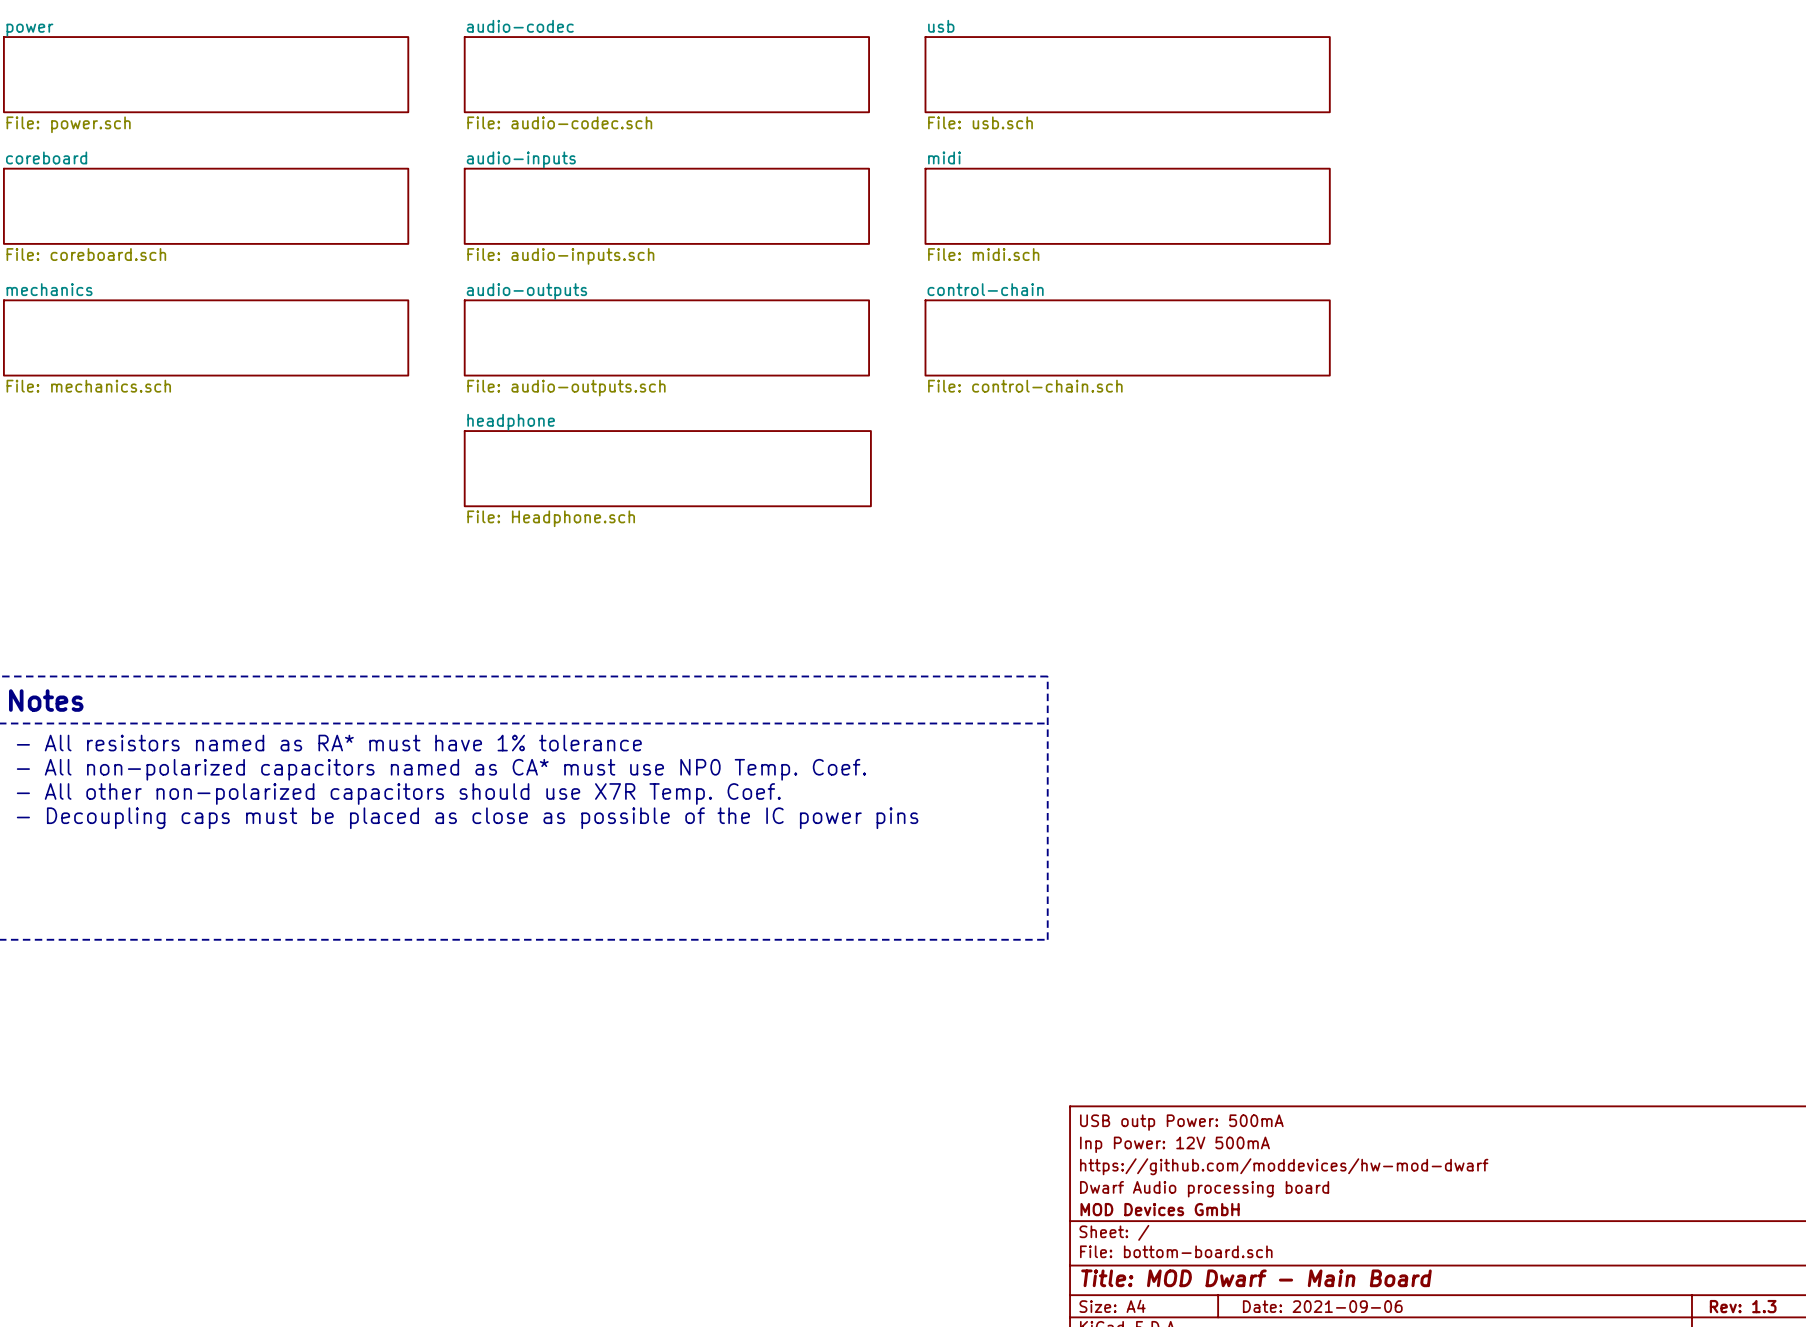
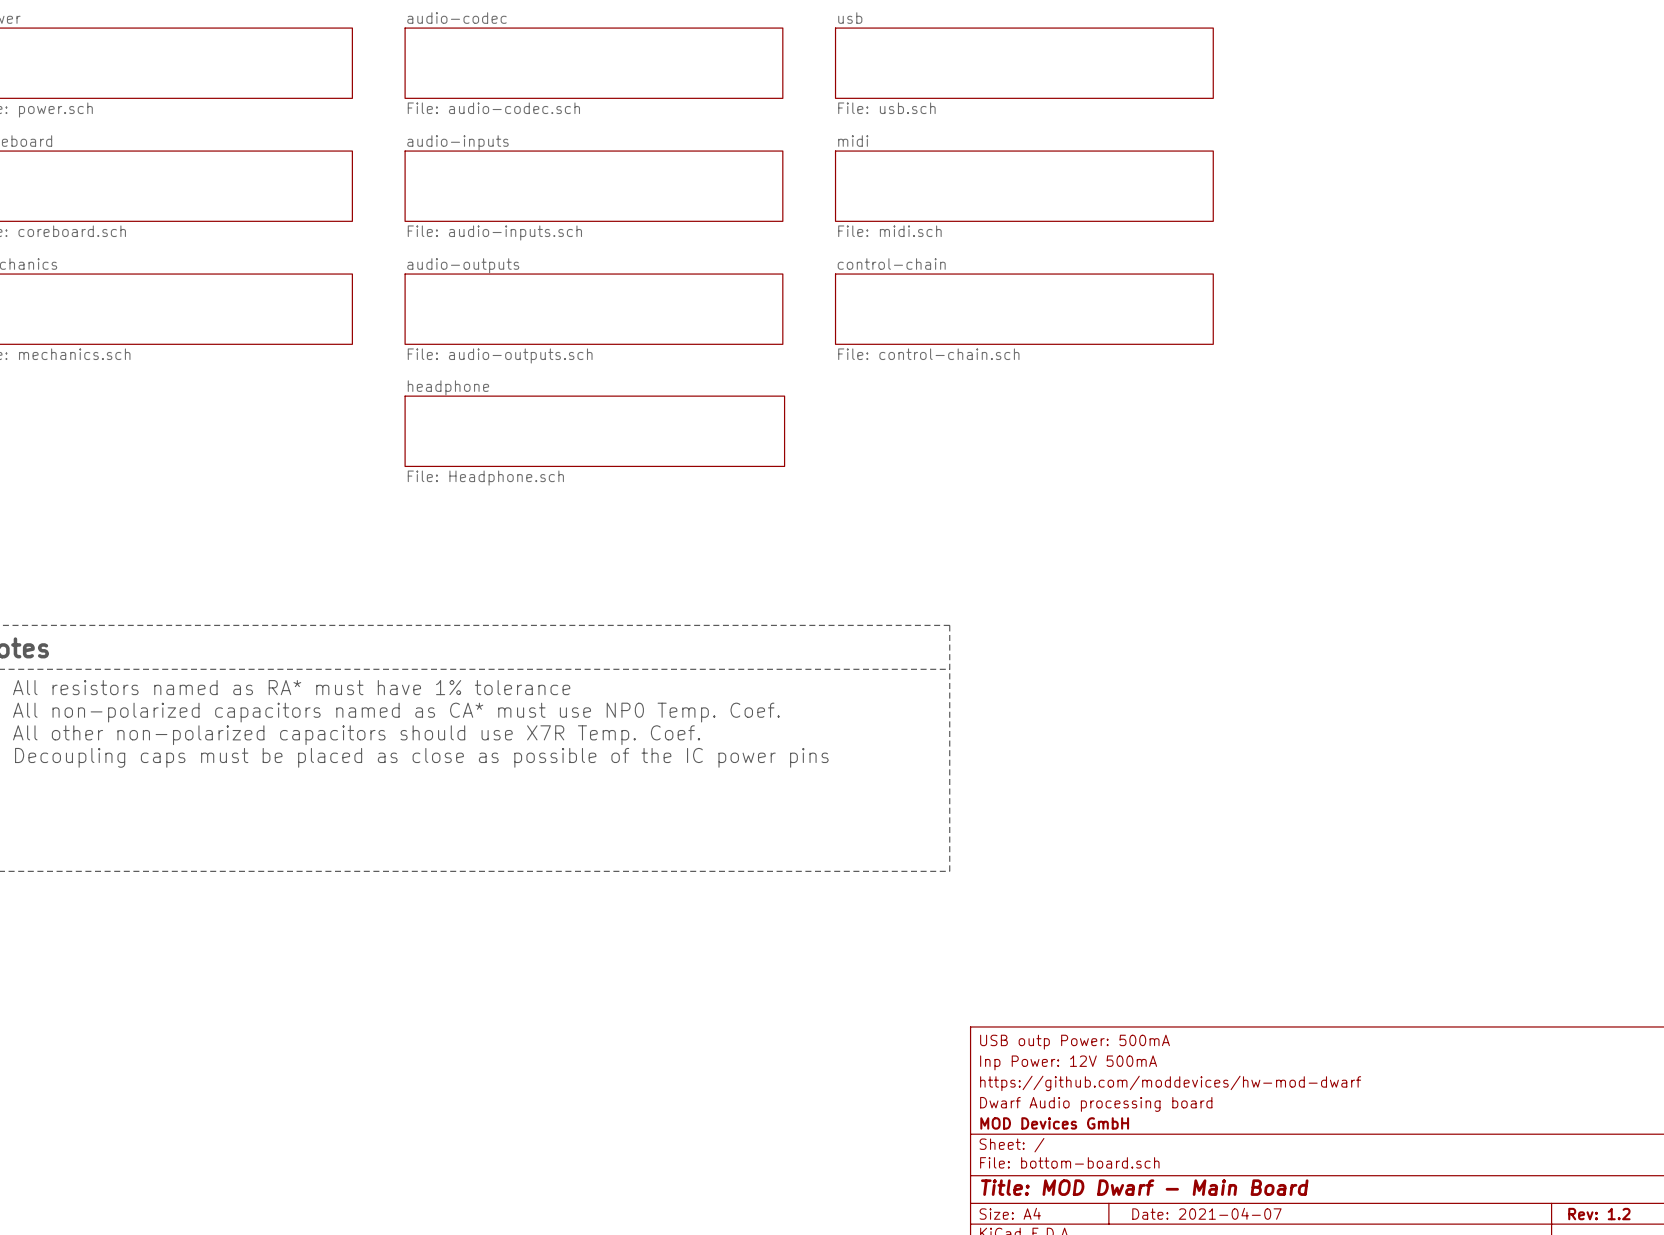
title block: Date: 2021-09-06 (1322, 1306) -> Date: 2021-04-07 (1206, 1213)
title block: Rev: 1.3 (1743, 1306) -> Rev: 1.2 (1599, 1214)

